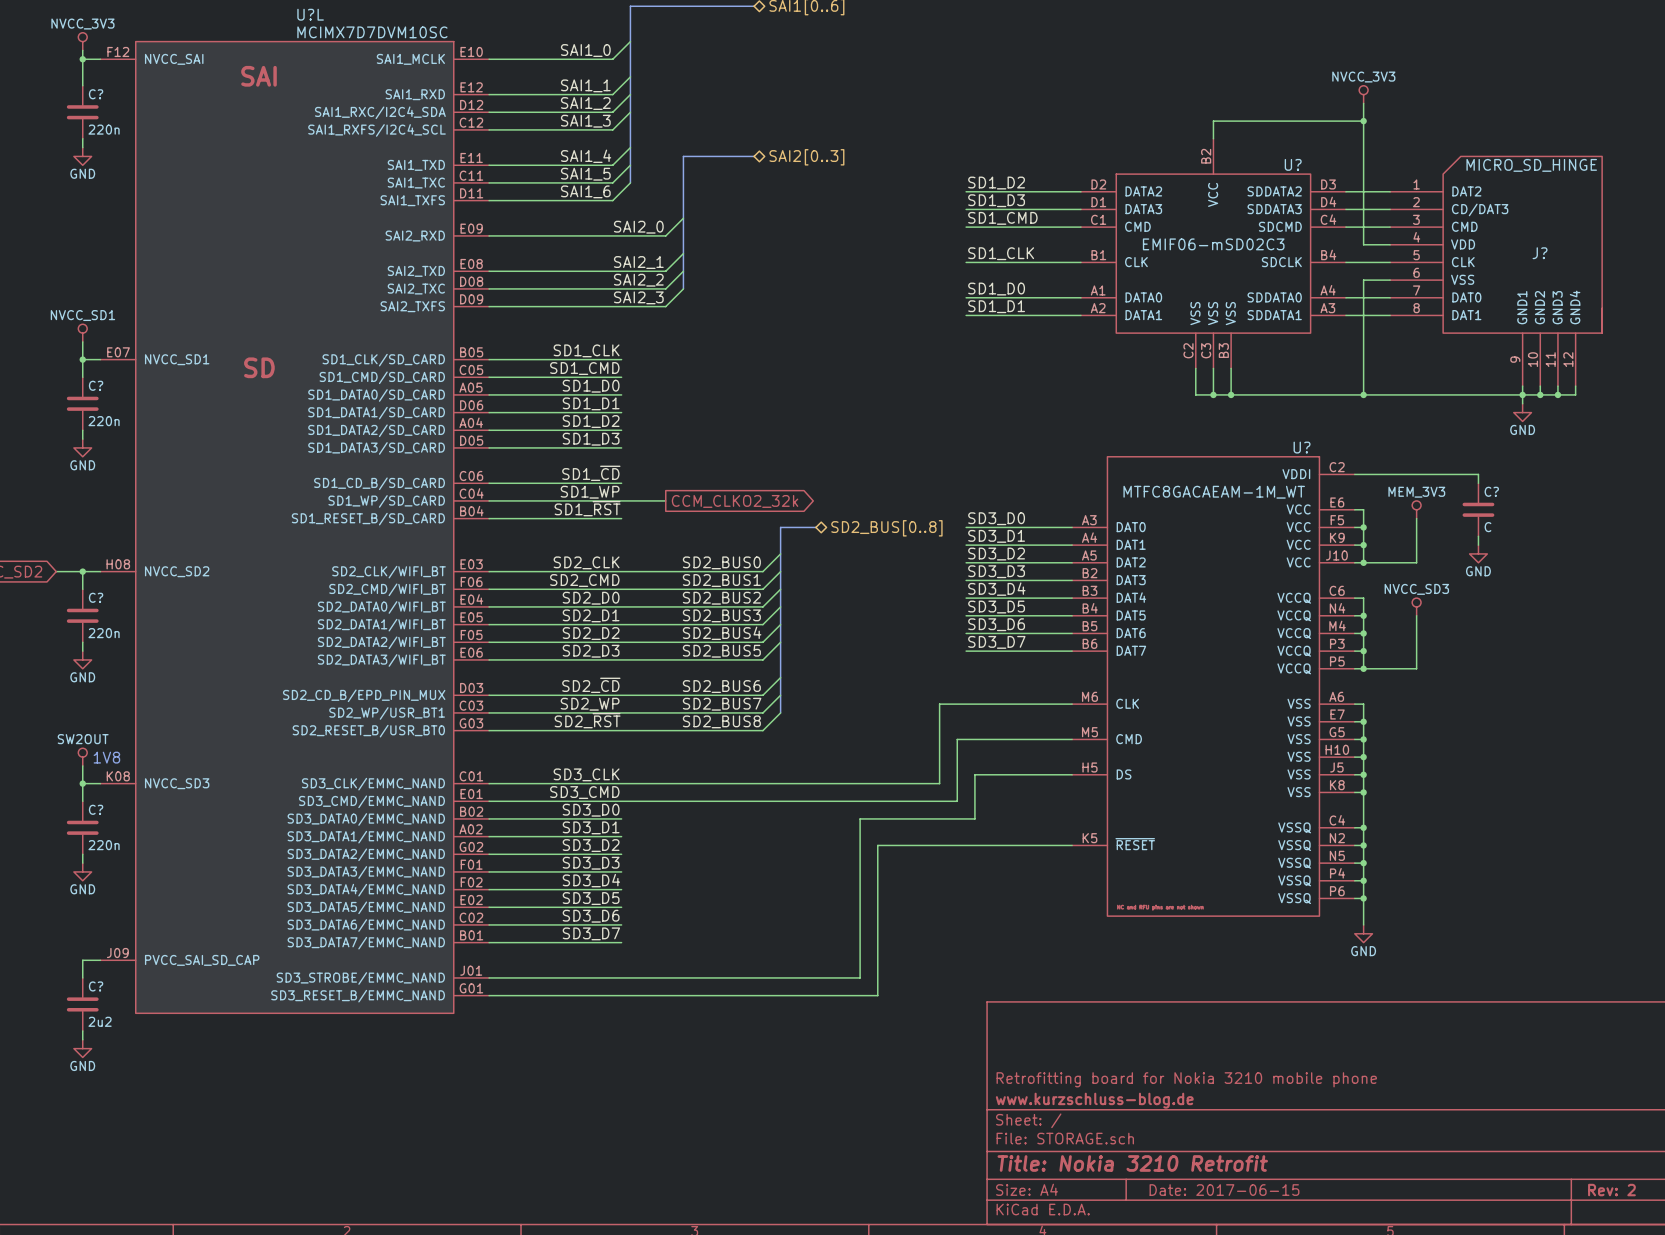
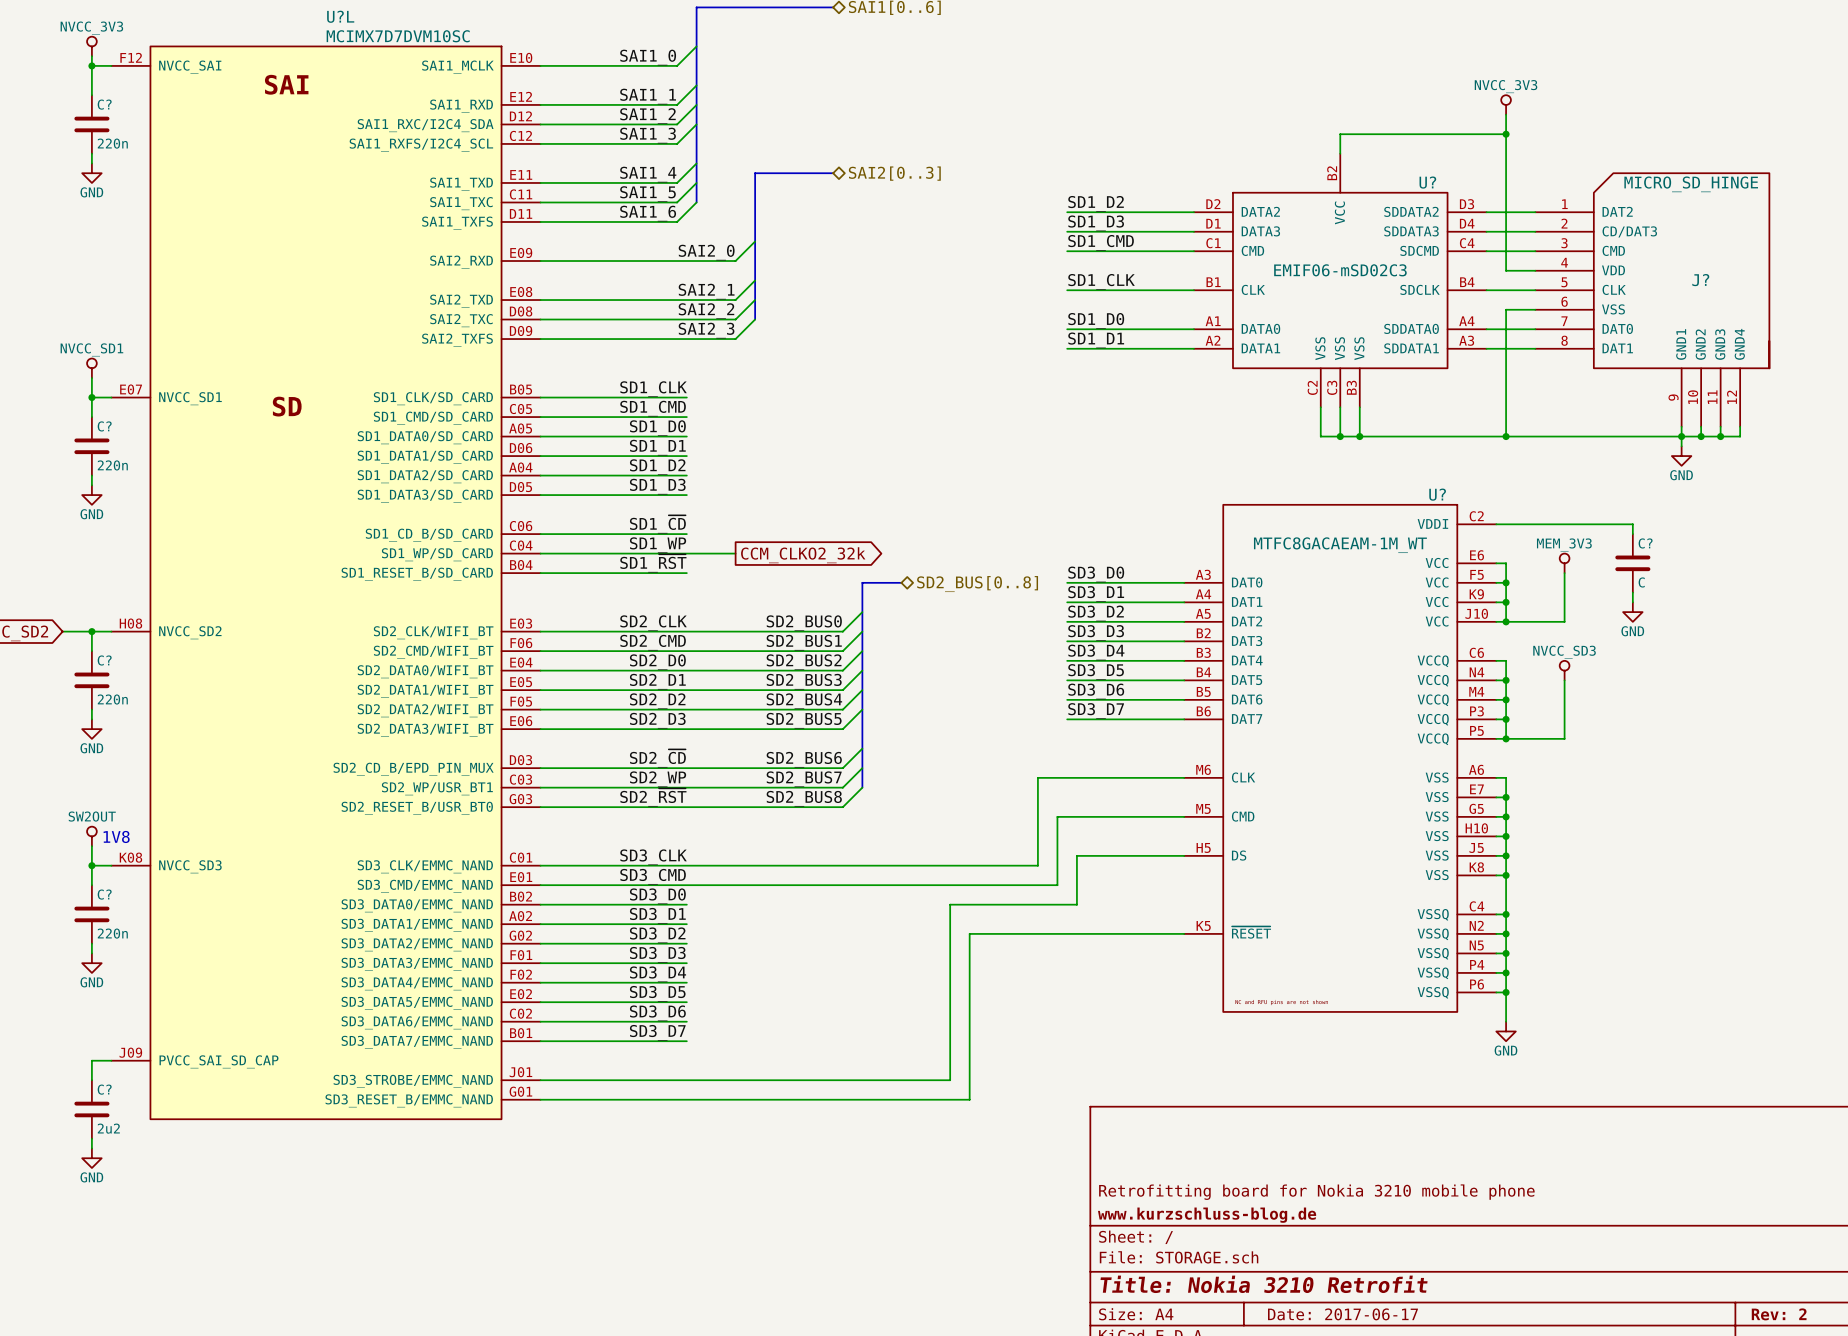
title block: Date: 2017-06-15 (1224, 1190) -> Date: 2017-06-17 (1342, 1314)

